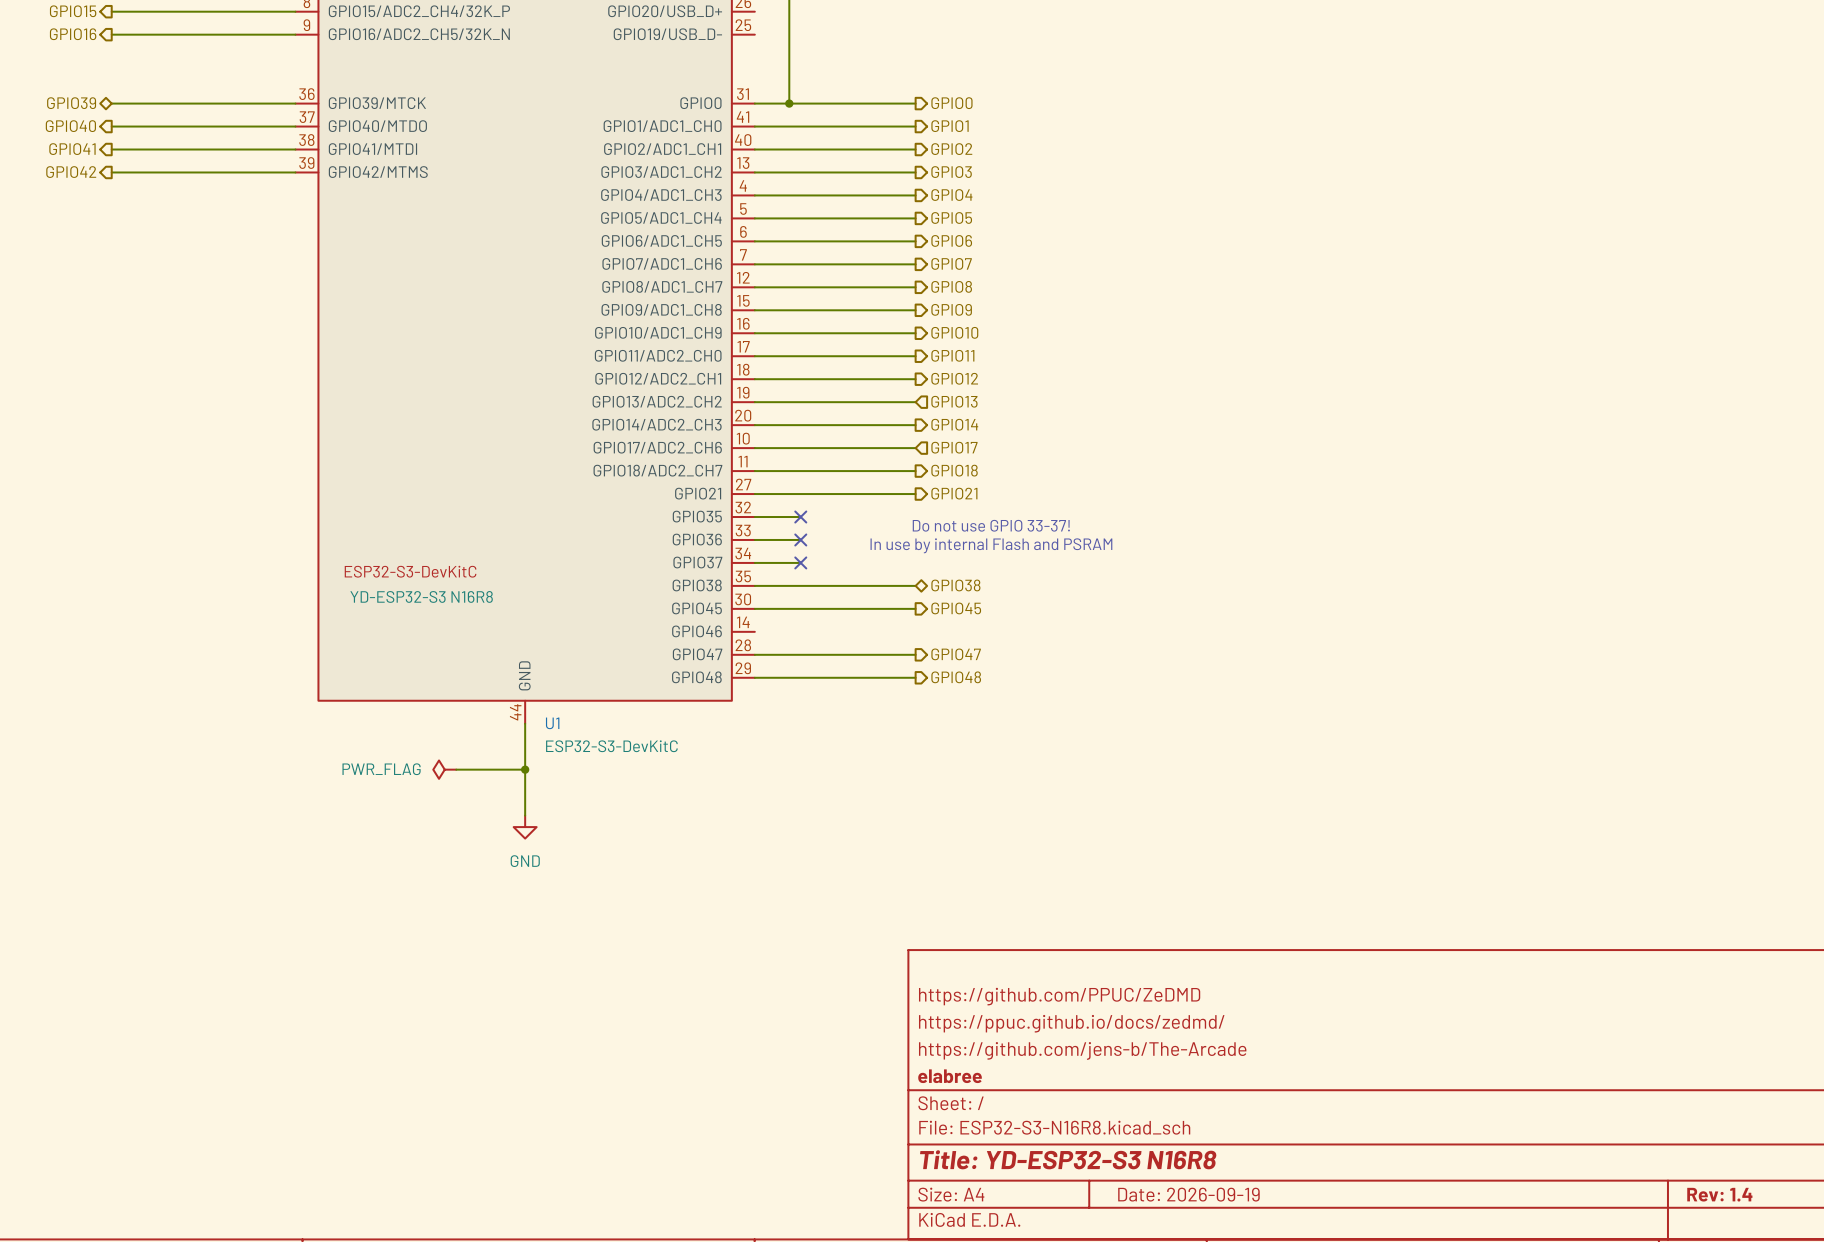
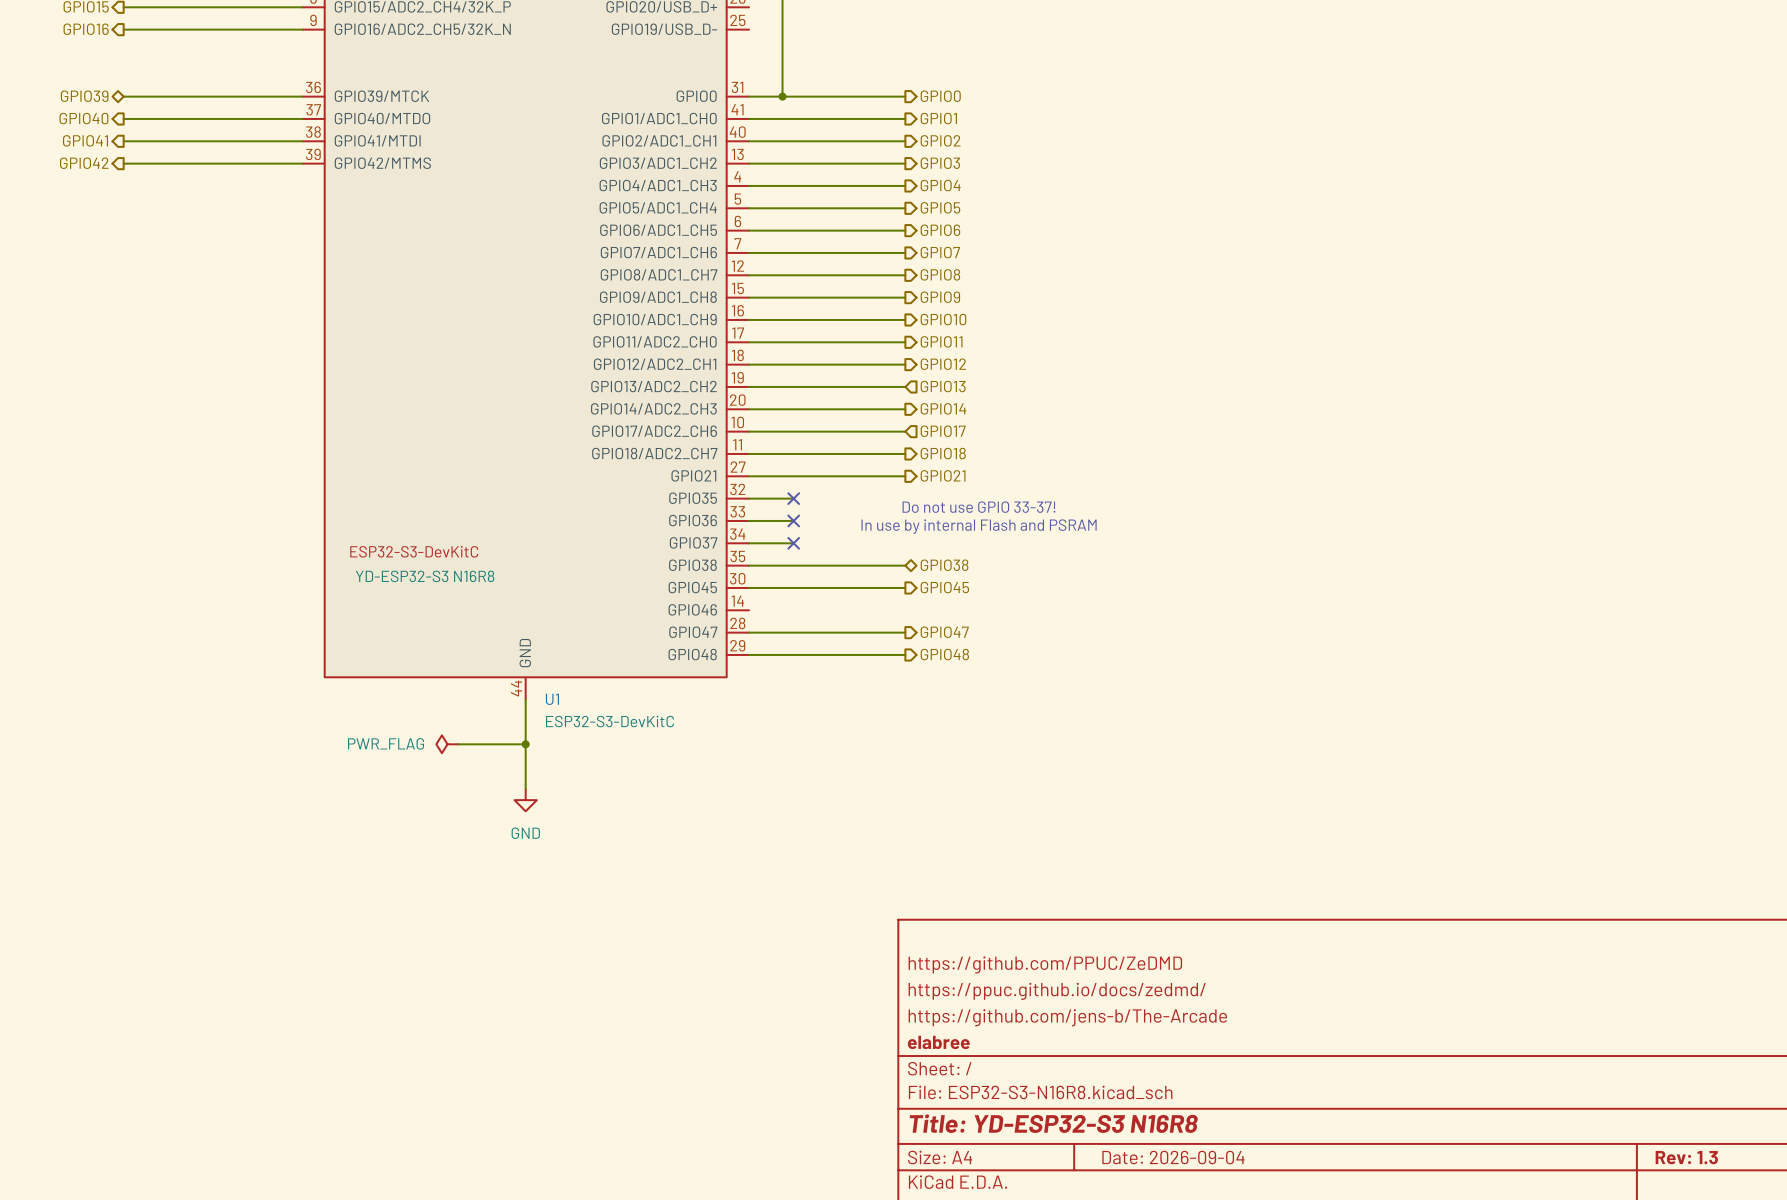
title block: Date: 2026-09-19 (1188, 1194) -> Date: 2026-09-04 (1173, 1157)
title block: Rev: 1.4 (1719, 1194) -> Rev: 1.3 (1686, 1157)

